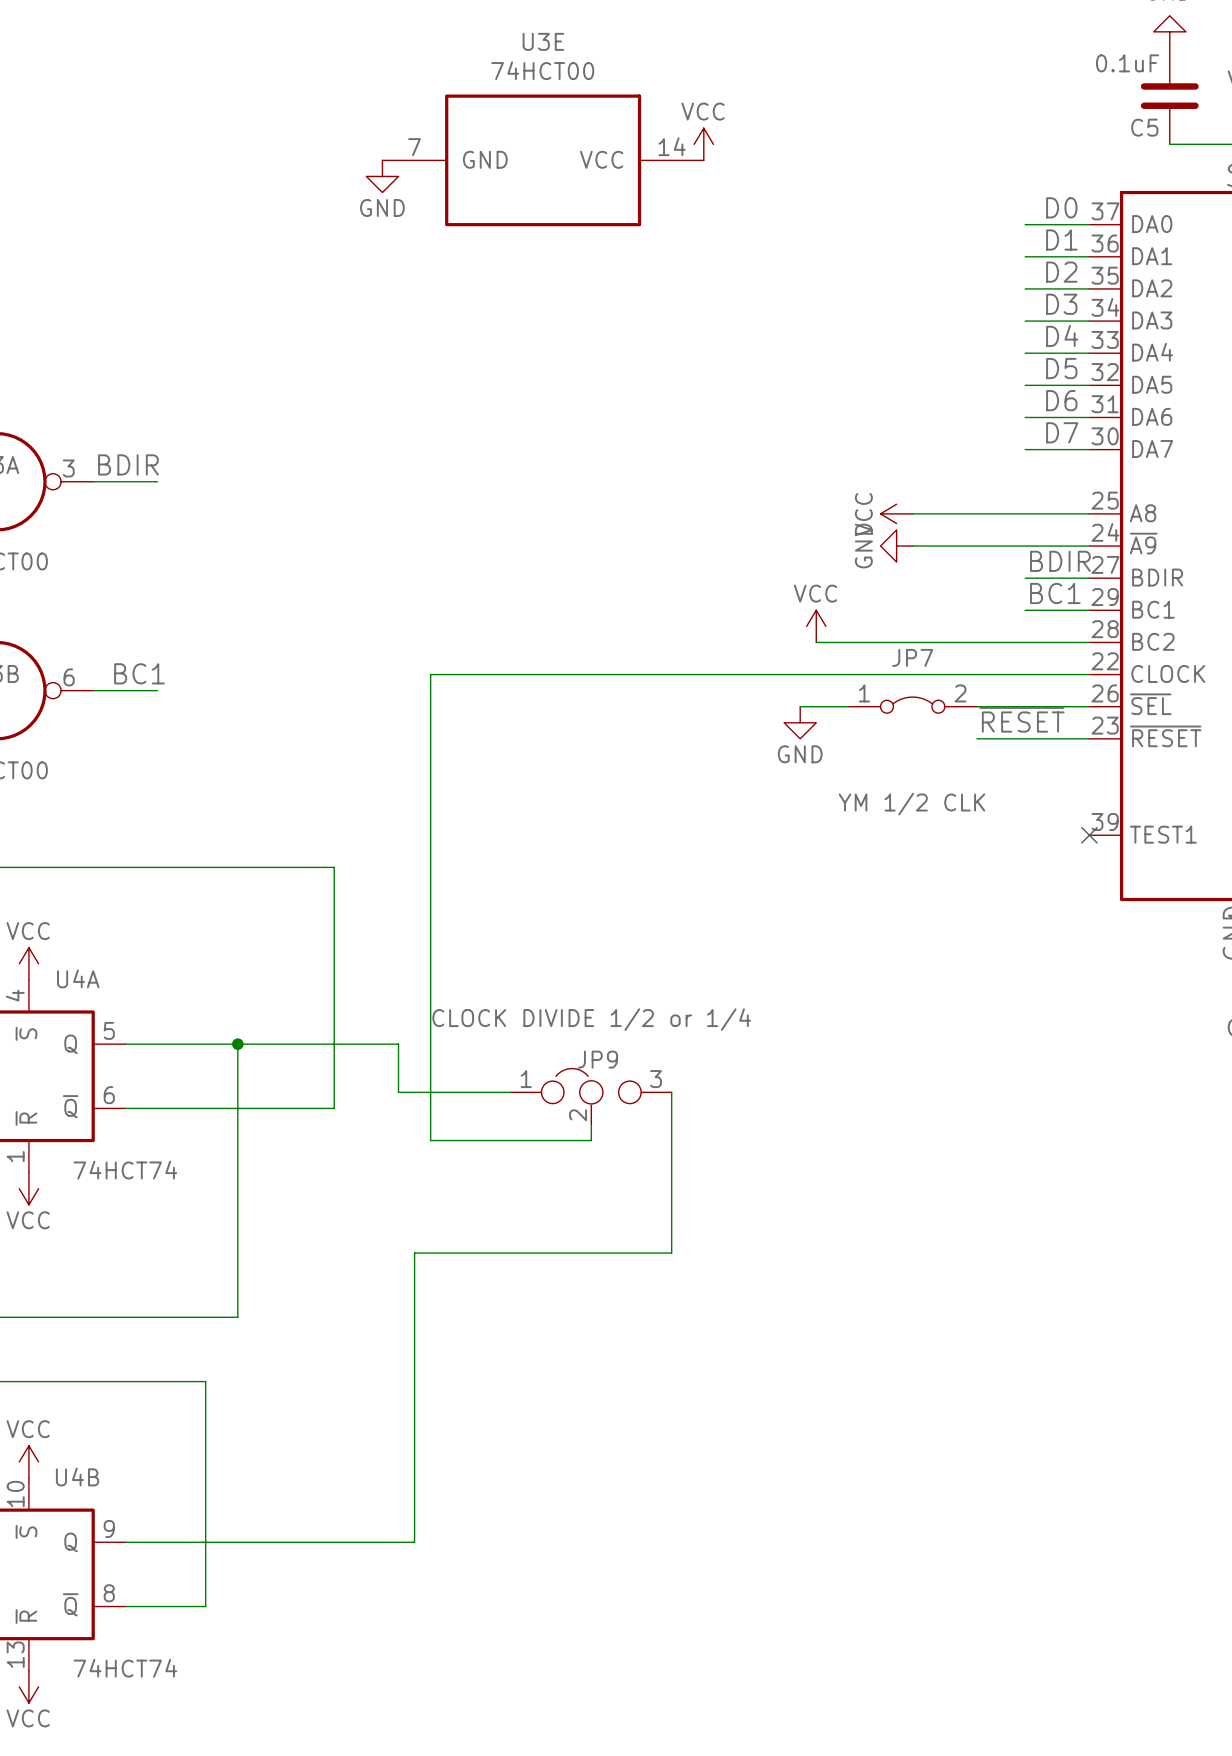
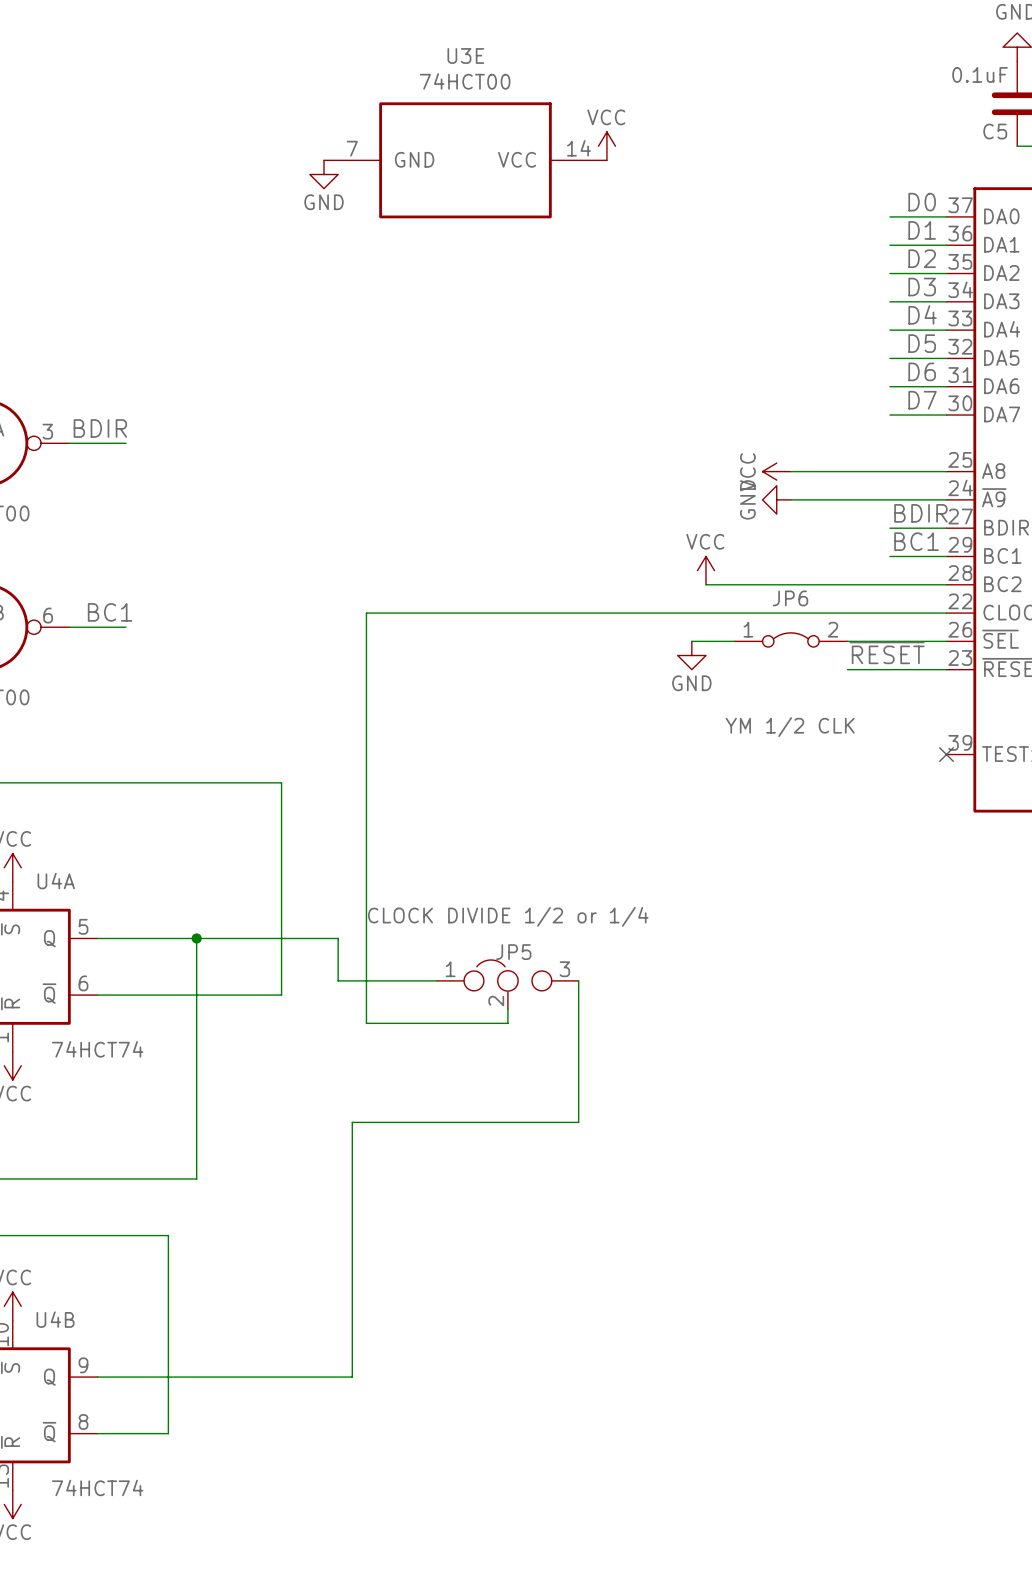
JP7 name: JP7 (912, 657) -> JP6 (790, 598)
JP9 name: JP9 (597, 1059) -> JP5 (513, 952)

